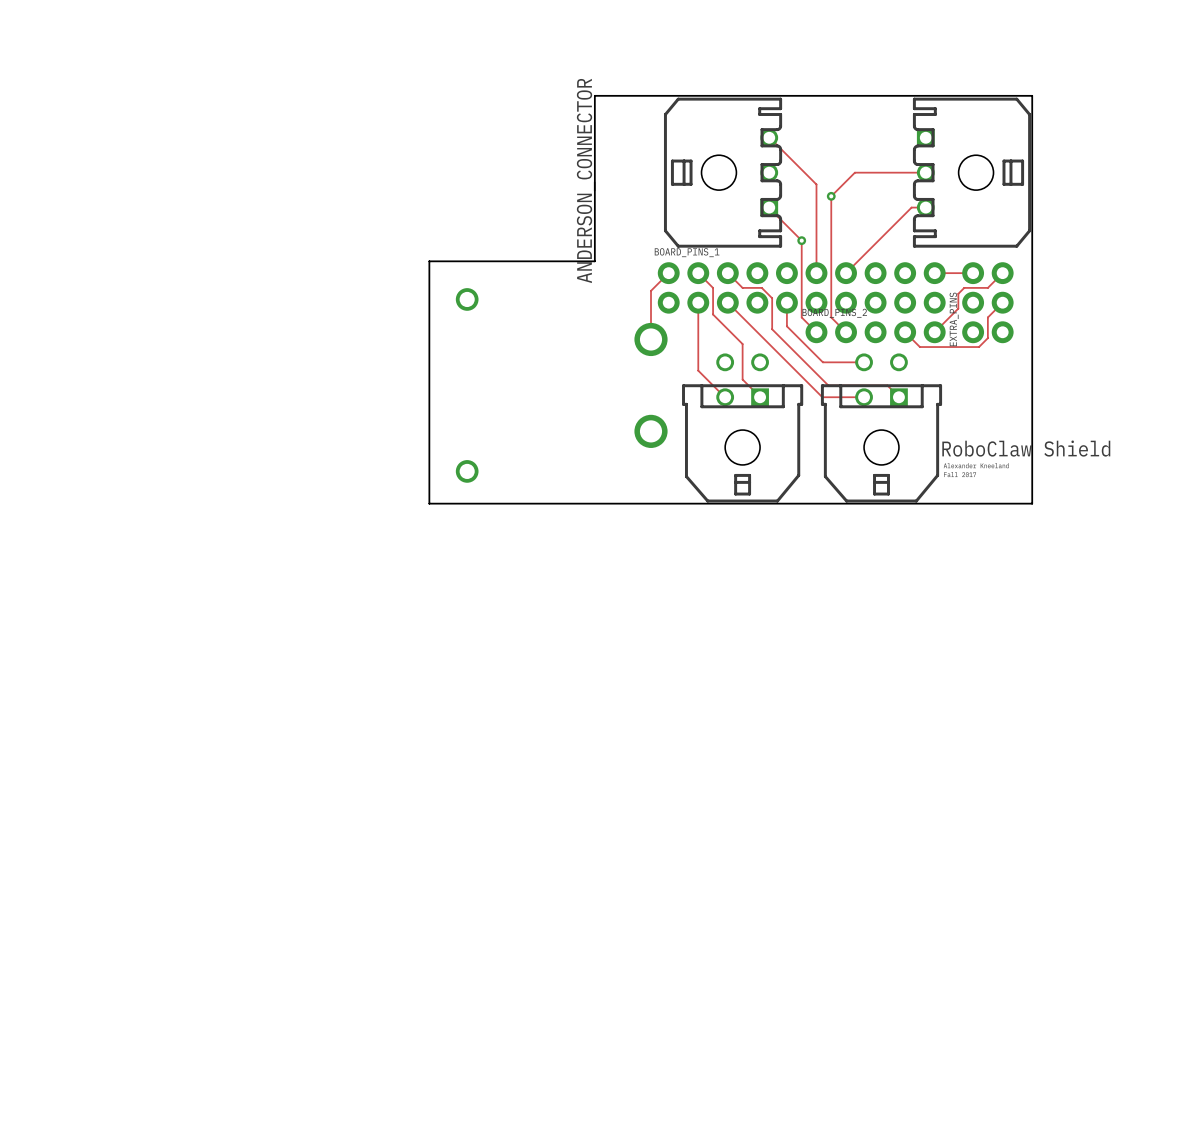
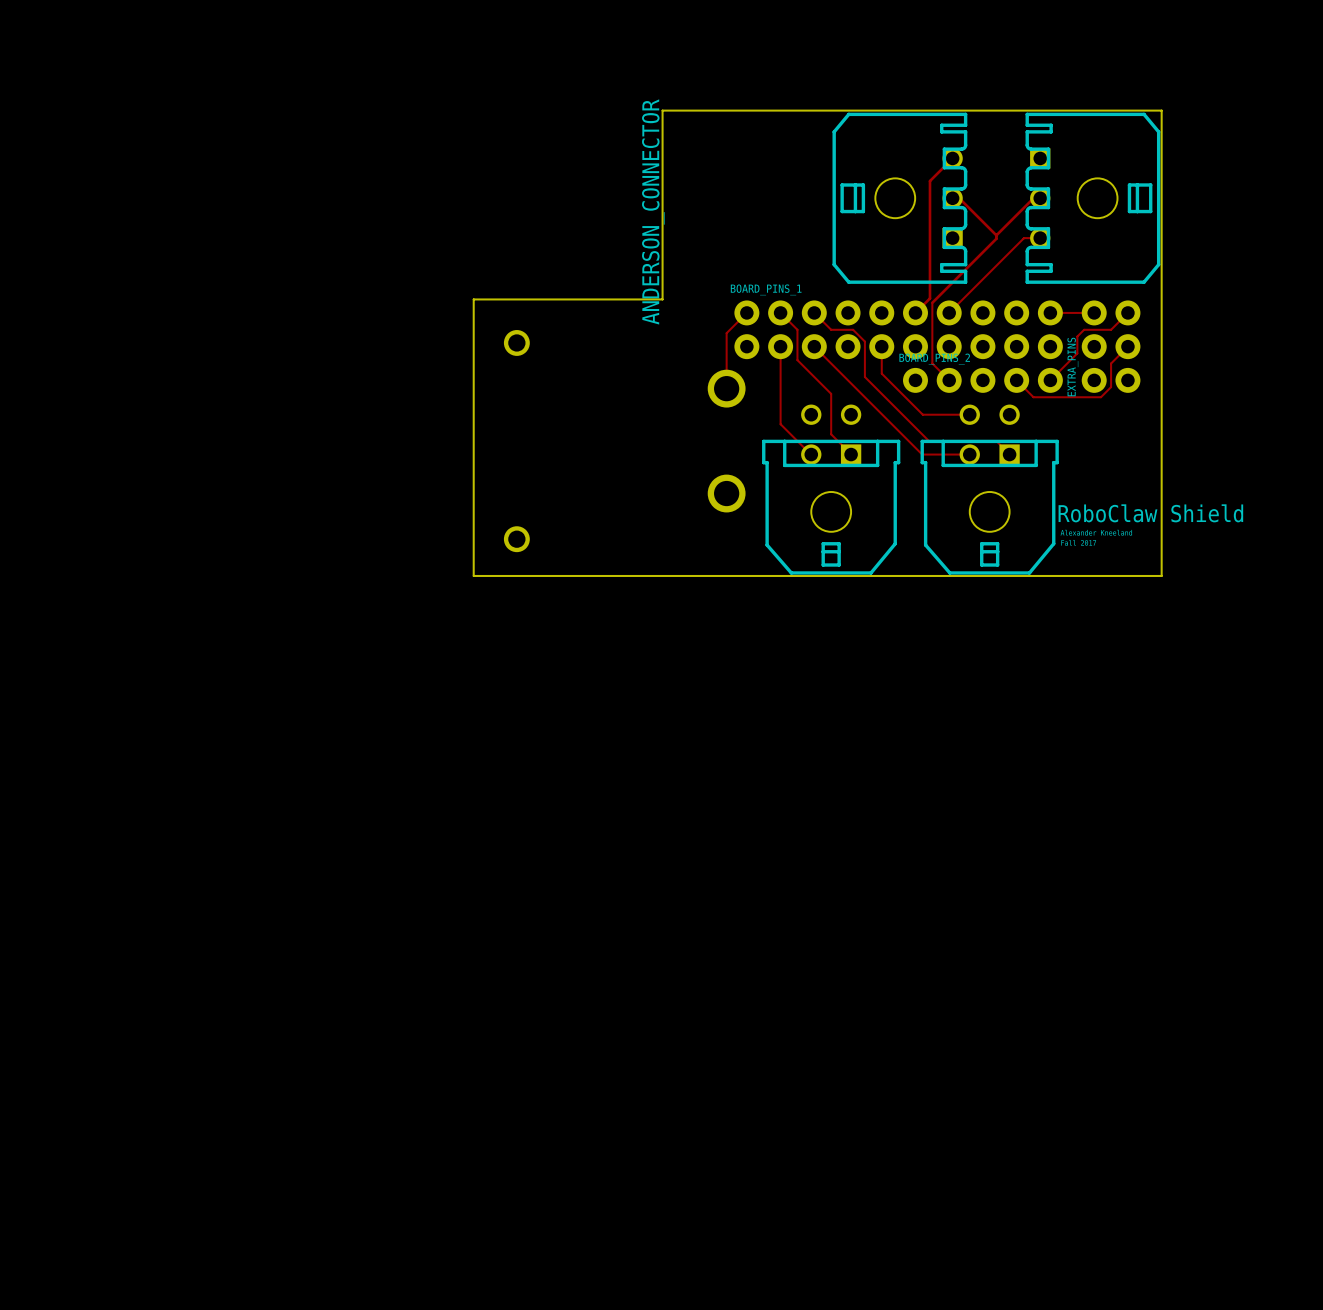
track: (769, 137) (816, 184) (816, 273) -> (952, 158) (929, 181) (929, 298) (915, 312)
part position: (723, 172) -> (899, 198)
track: none -> (952, 198) (959, 198) (996, 235)
track: (919, 172) (854, 172) (831, 196) (831, 264) -> (996, 235) (996, 238) (932, 302)
track: none -> (1033, 198) (996, 235)
via: (831, 196) -> none
track: (769, 207) (801, 240) (801, 317) (816, 332) -> none
via: (801, 240) -> none

